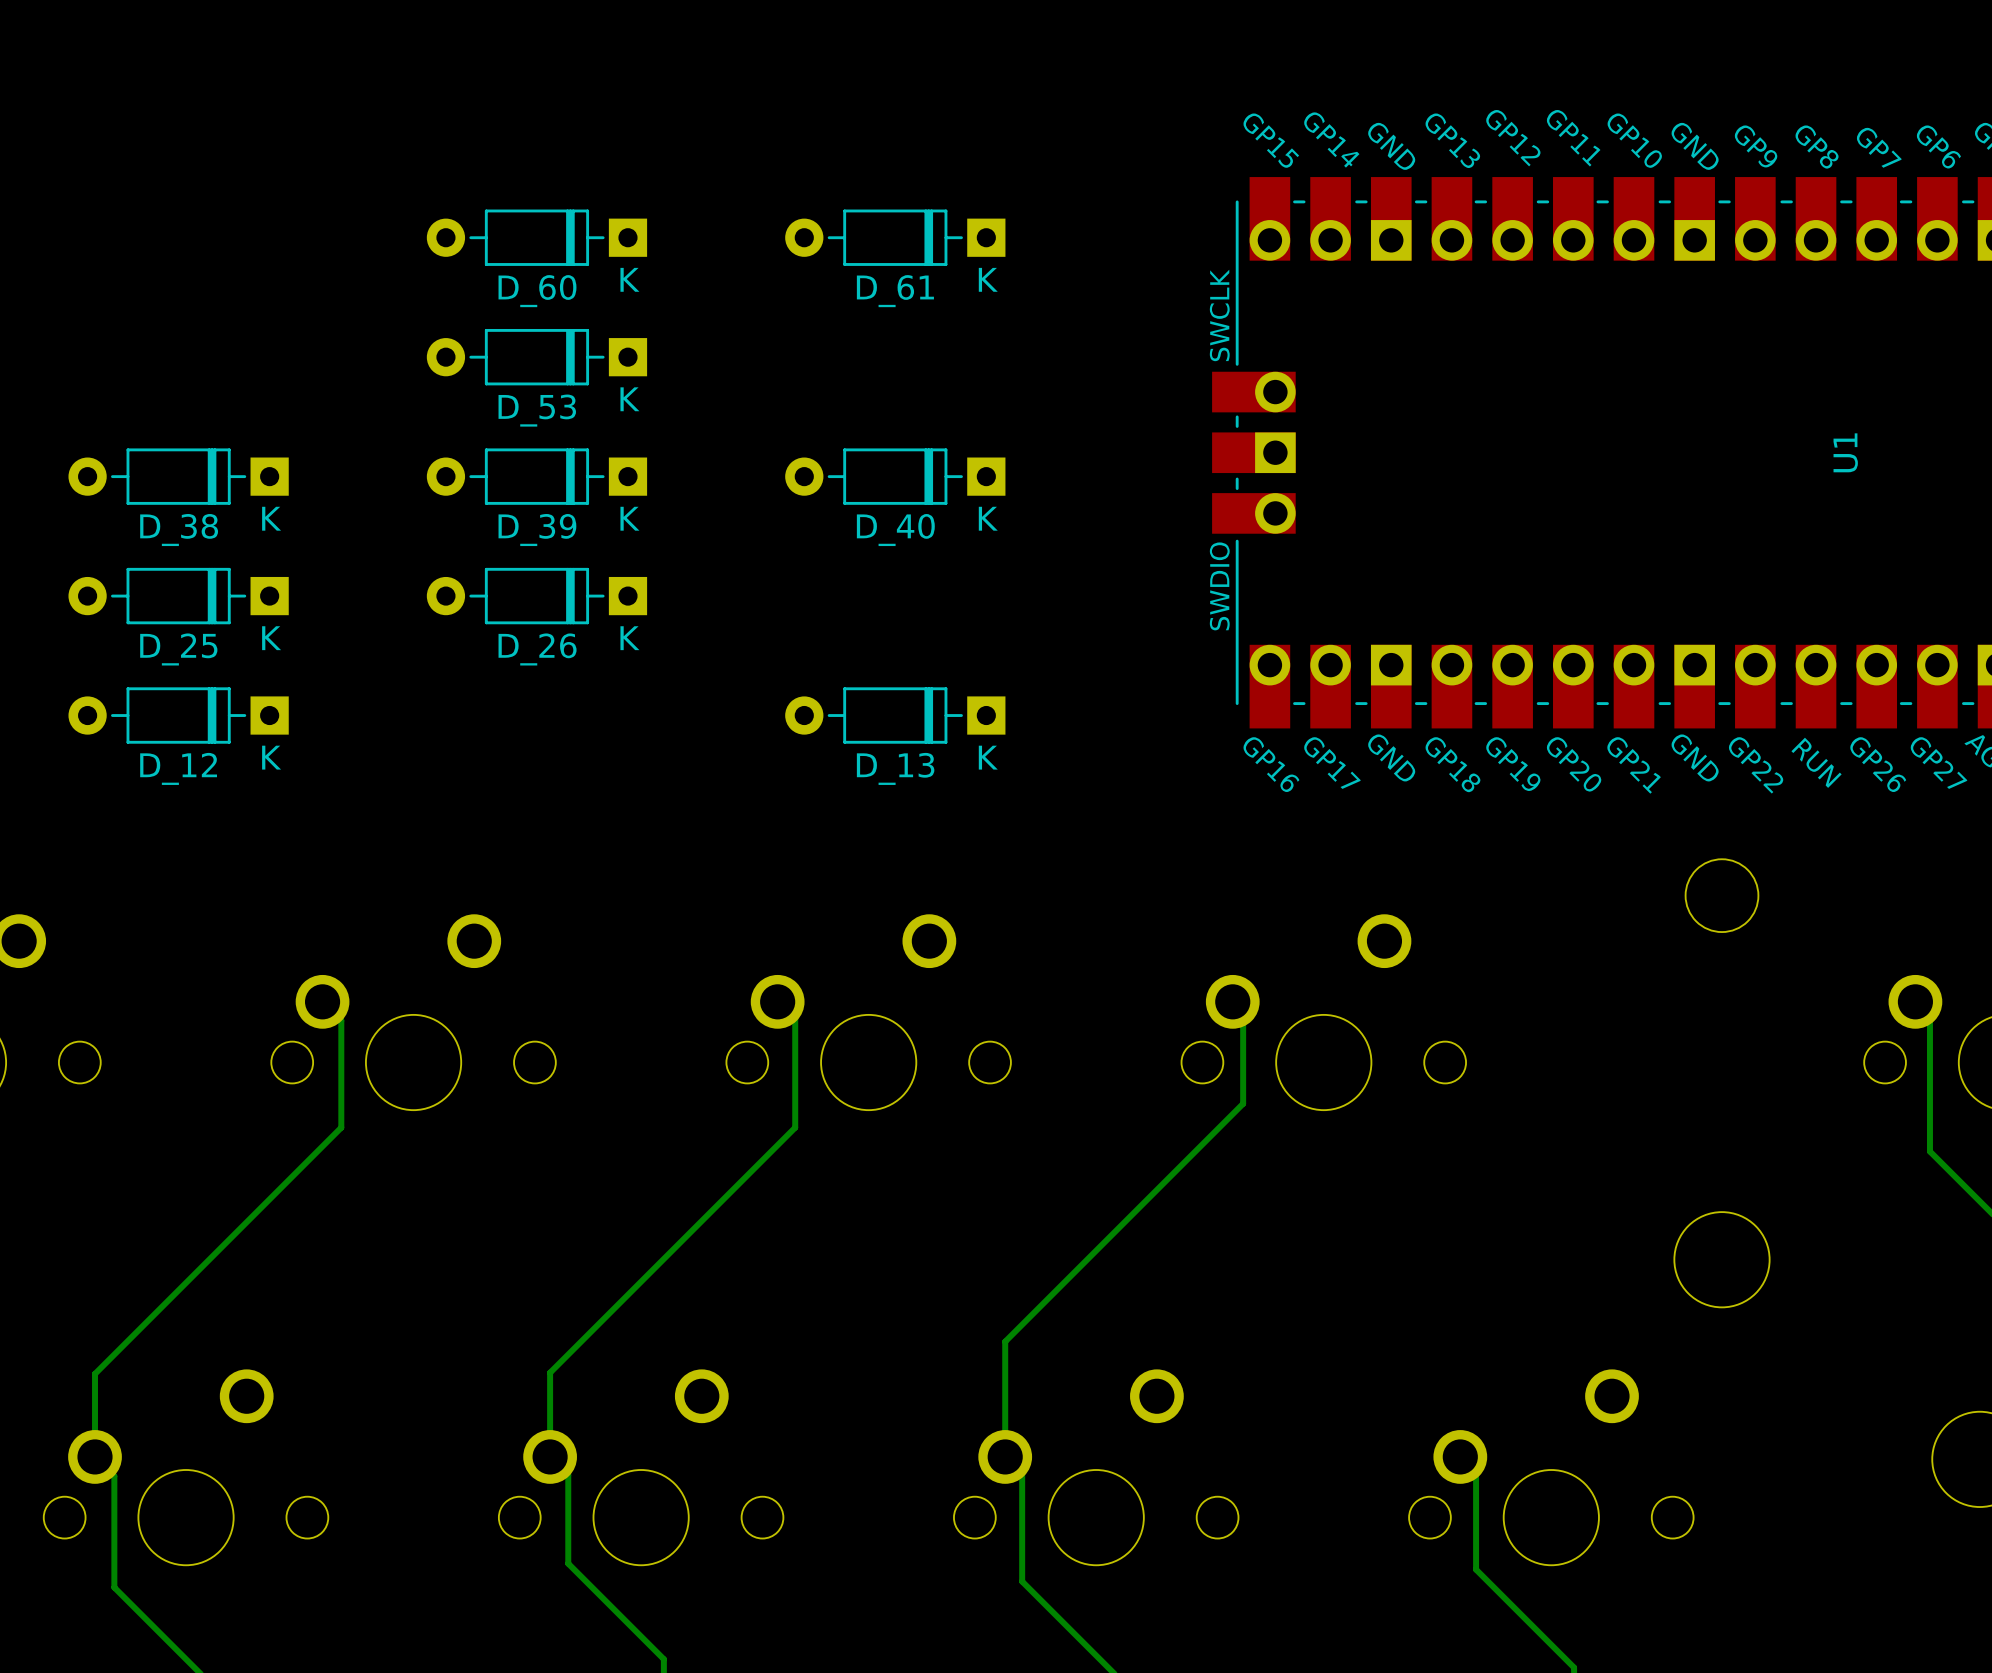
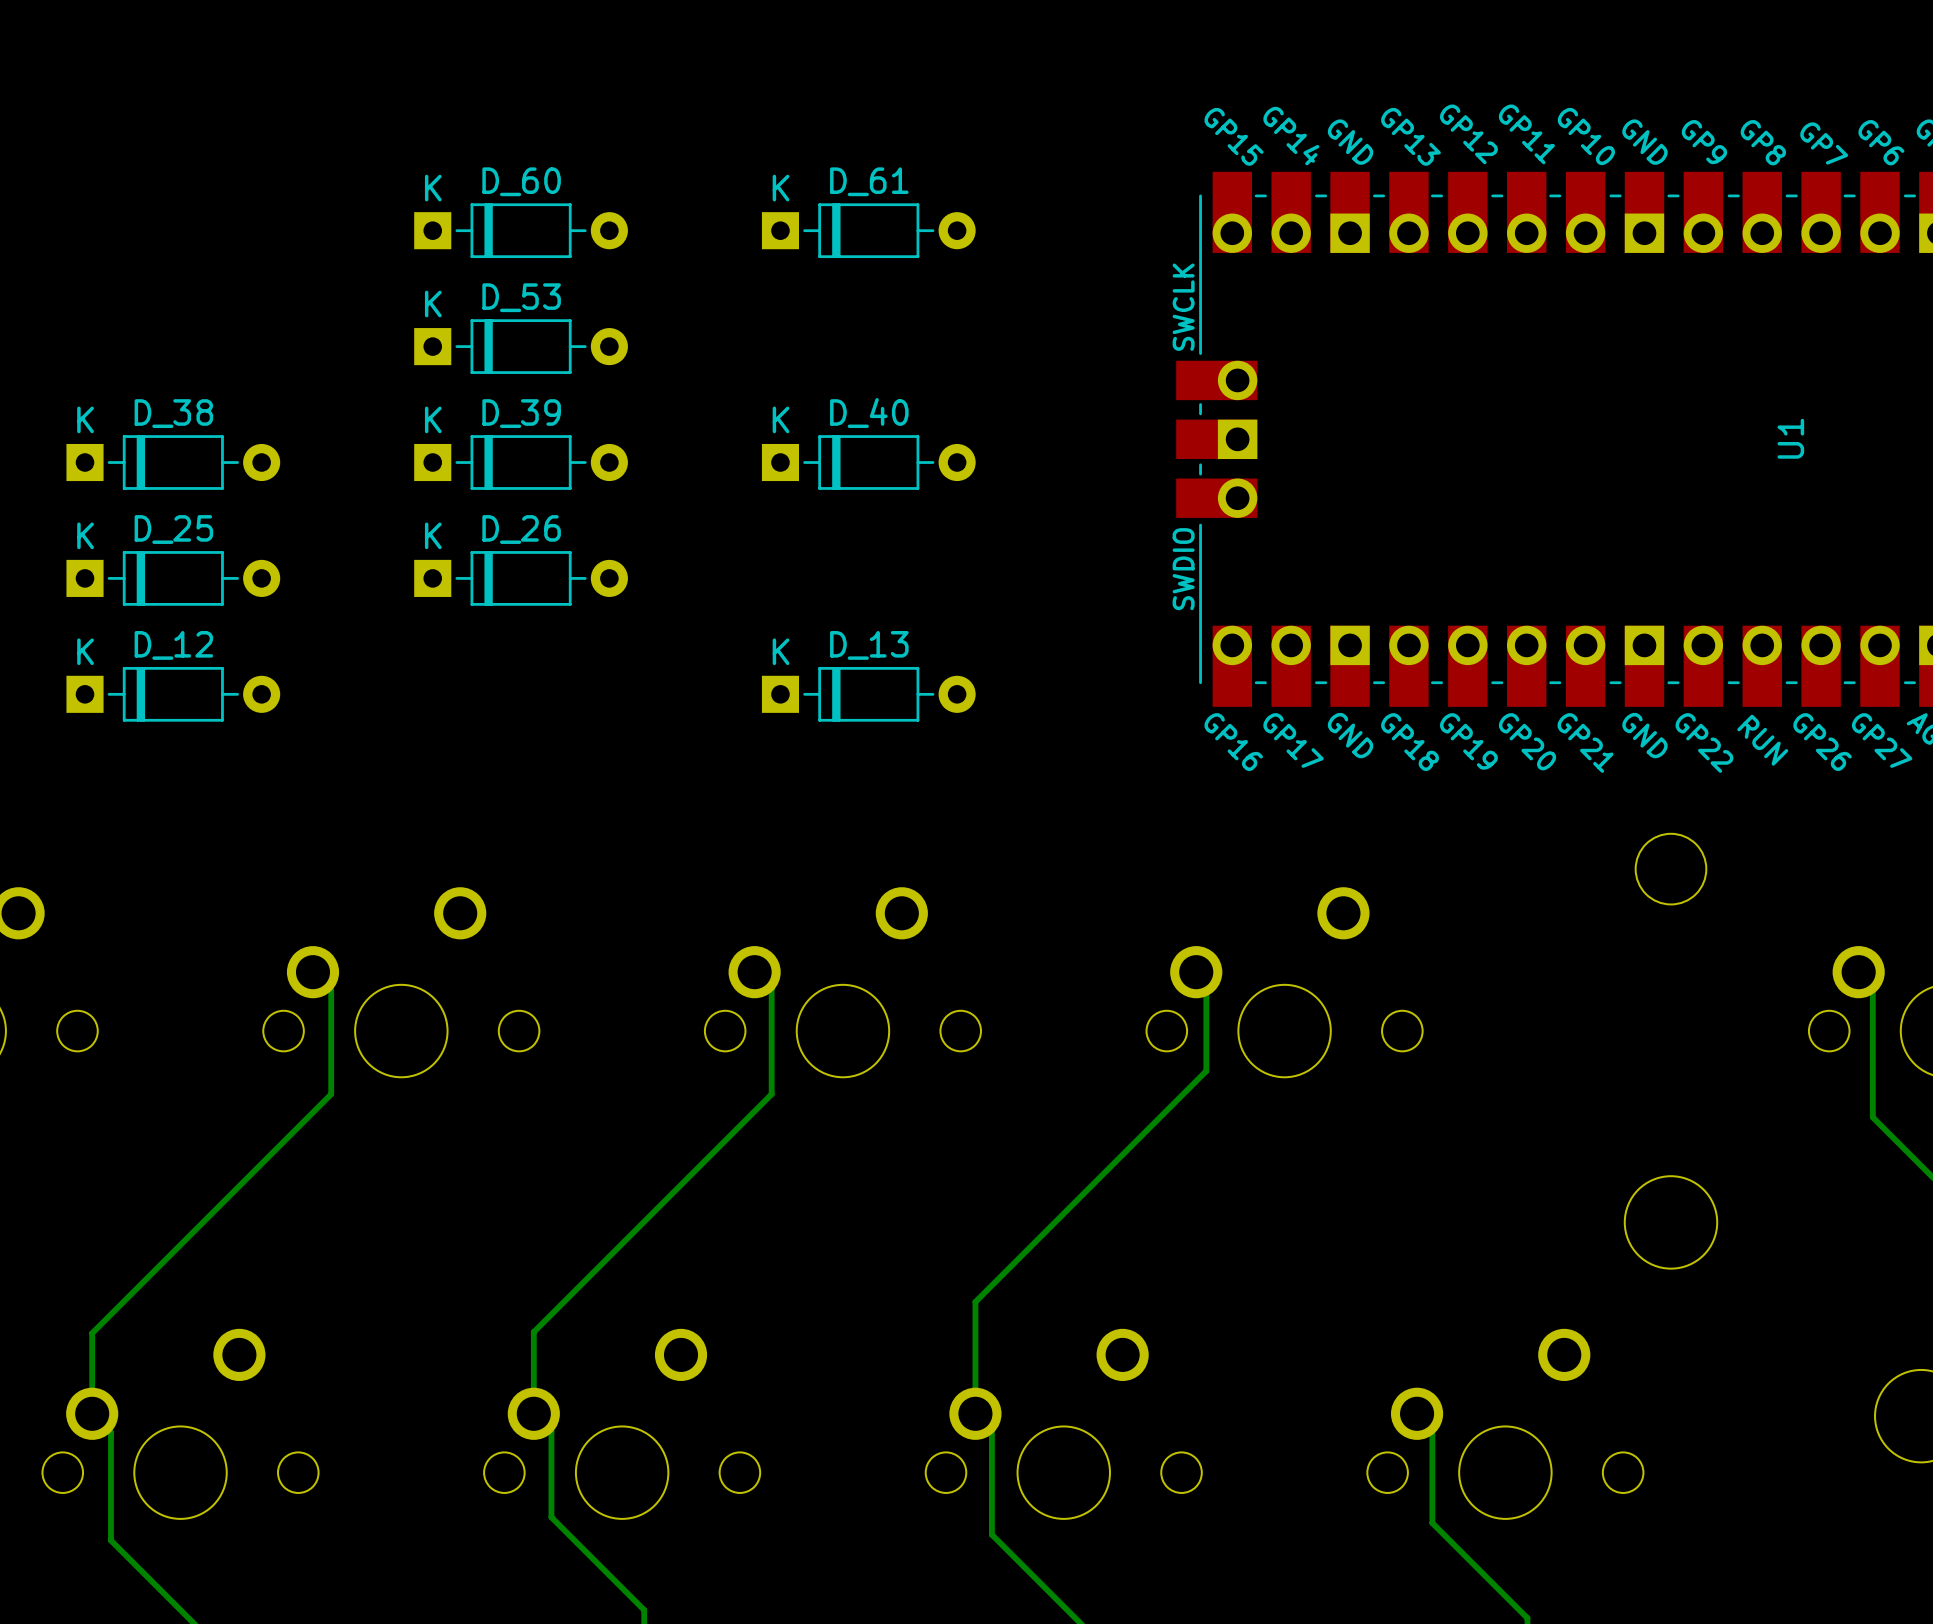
D_60 rotation: 0° (536, 237) -> 180° (521, 230)
D_61 rotation: 0° (895, 237) -> 180° (868, 230)
D_53 rotation: 0° (536, 357) -> 180° (521, 346)
D_38 rotation: 0° (178, 476) -> 180° (173, 462)
D_39 rotation: 0° (536, 476) -> 180° (521, 462)
D_40 rotation: 0° (895, 476) -> 180° (868, 462)
D_25 rotation: 0° (178, 596) -> 180° (173, 578)
D_26 rotation: 0° (536, 596) -> 180° (521, 578)
D_12 rotation: 0° (178, 715) -> 180° (173, 694)
D_13 rotation: 0° (895, 715) -> 180° (868, 694)

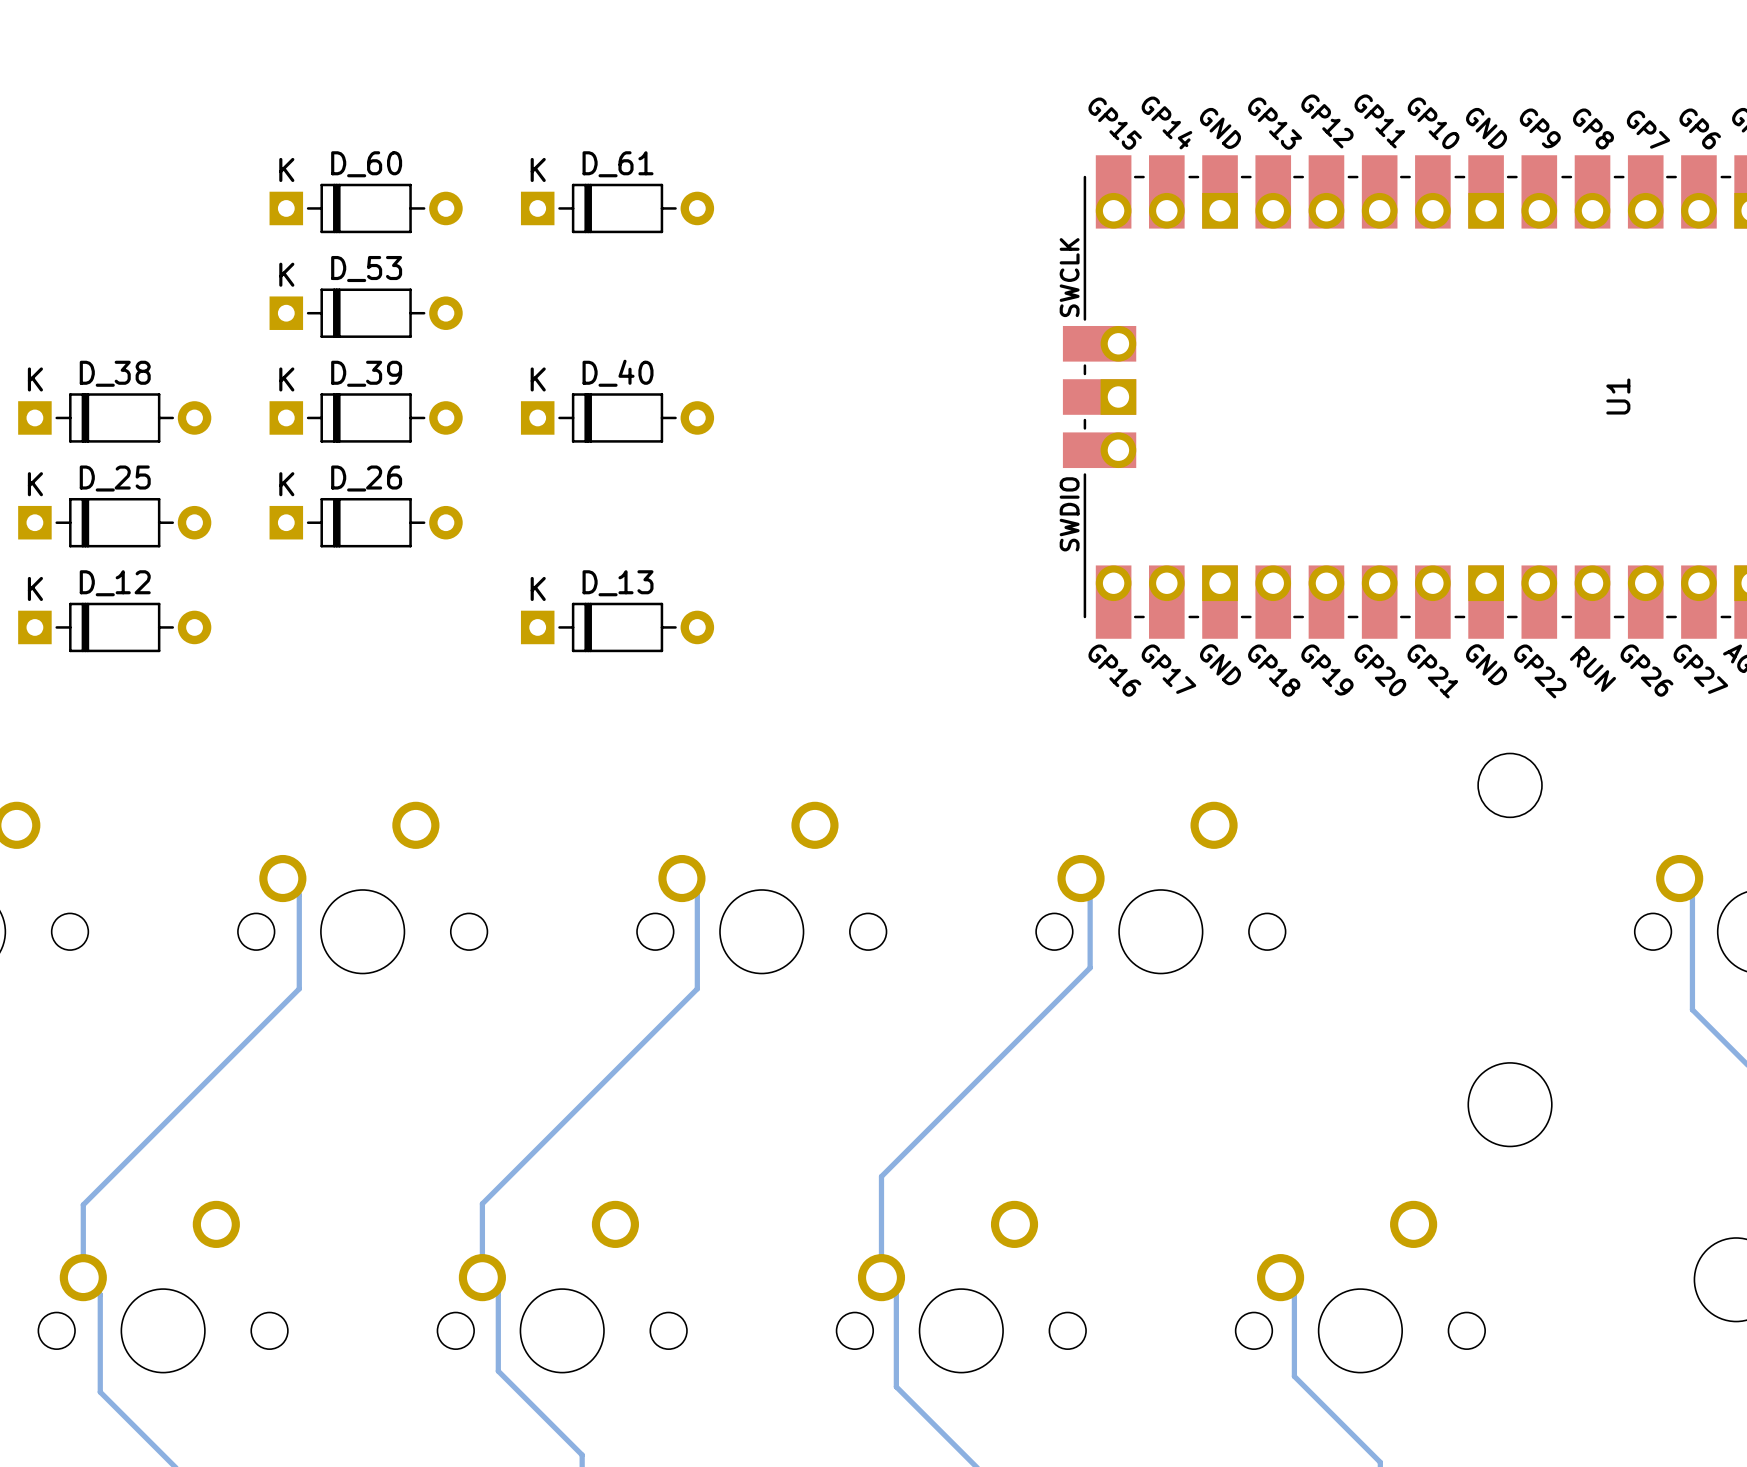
D_60 position: (521, 230) -> (366, 208)
D_61 position: (868, 230) -> (617, 208)
D_53 position: (521, 346) -> (366, 313)
D_38 position: (173, 462) -> (114, 417)
D_39 position: (521, 462) -> (366, 417)
D_40 position: (868, 462) -> (617, 417)
D_25 position: (173, 578) -> (114, 522)
D_26 position: (521, 578) -> (366, 522)
D_12 position: (173, 694) -> (114, 627)
D_13 position: (868, 694) -> (617, 627)

